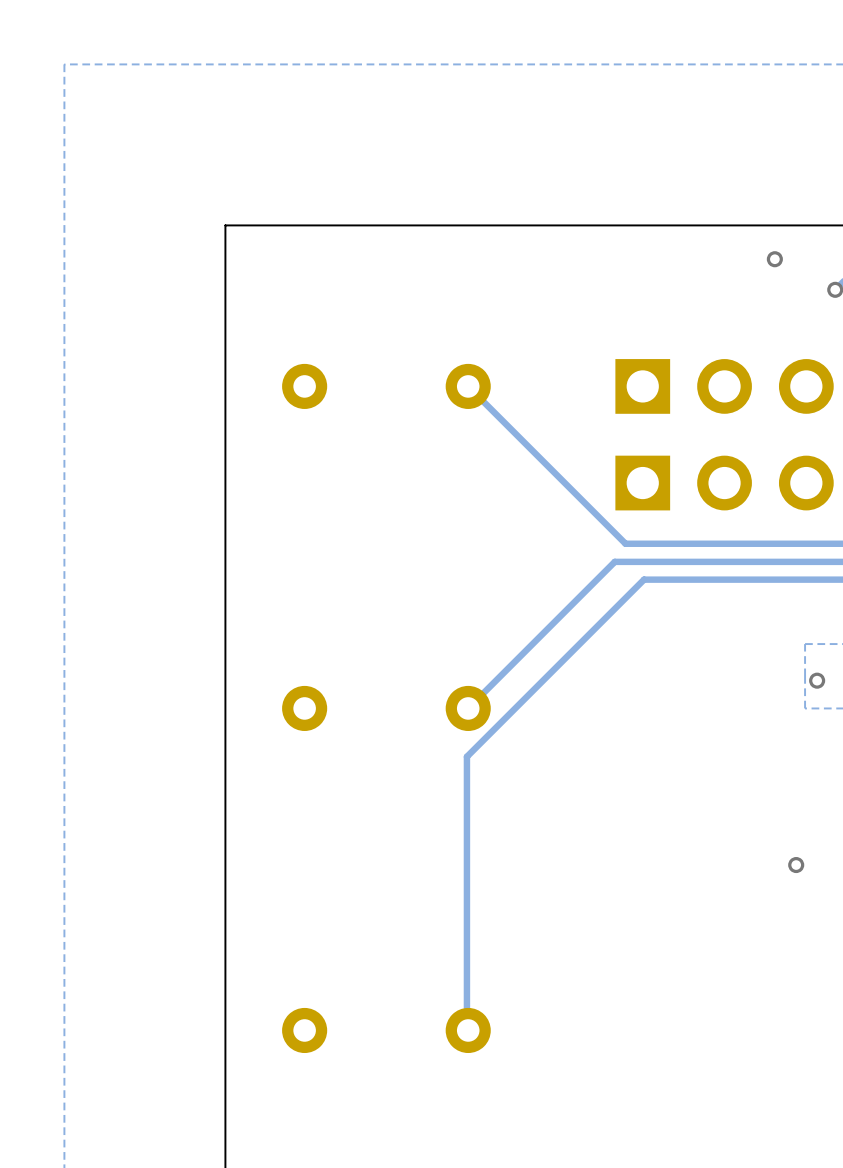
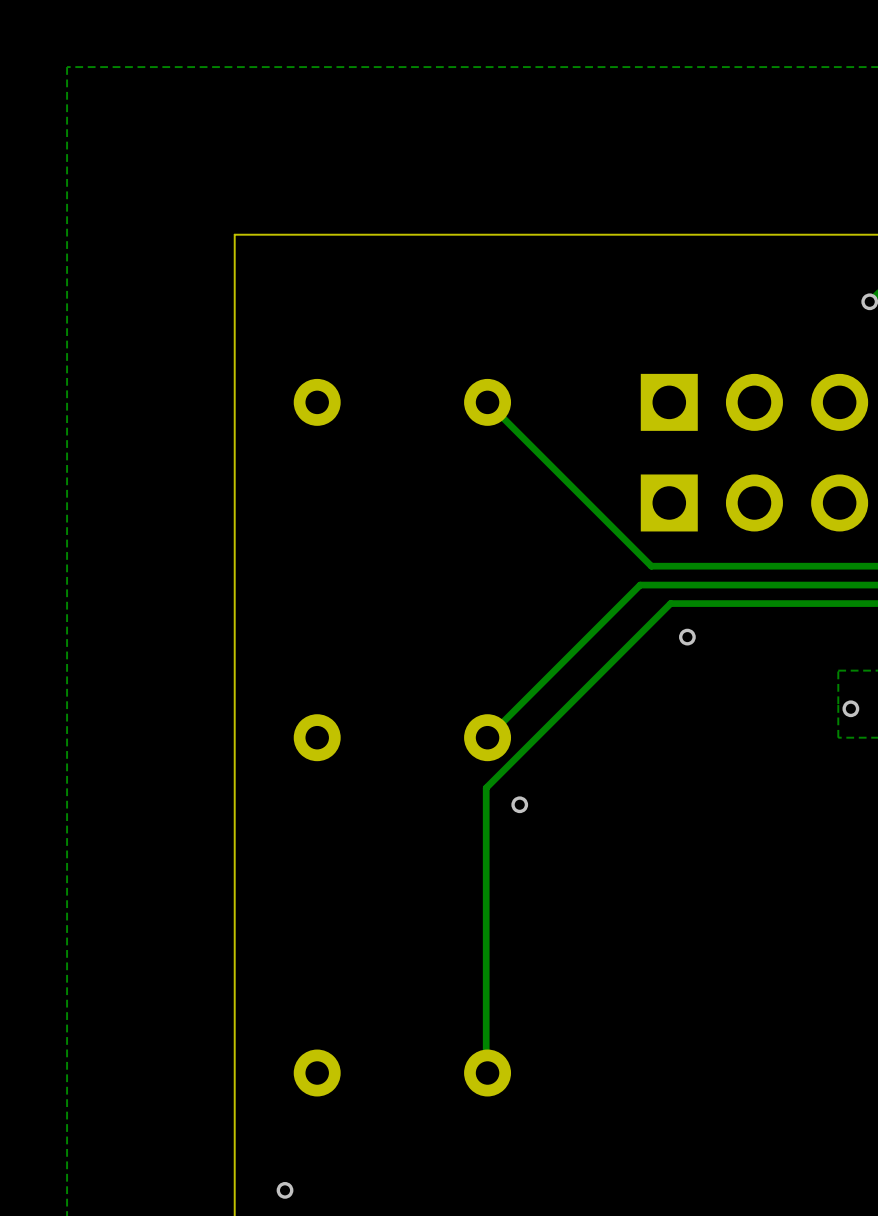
via: (774, 259) -> none
via: none -> (687, 637)
via: none -> (519, 804)
via: (796, 865) -> none
via: none -> (285, 1190)

